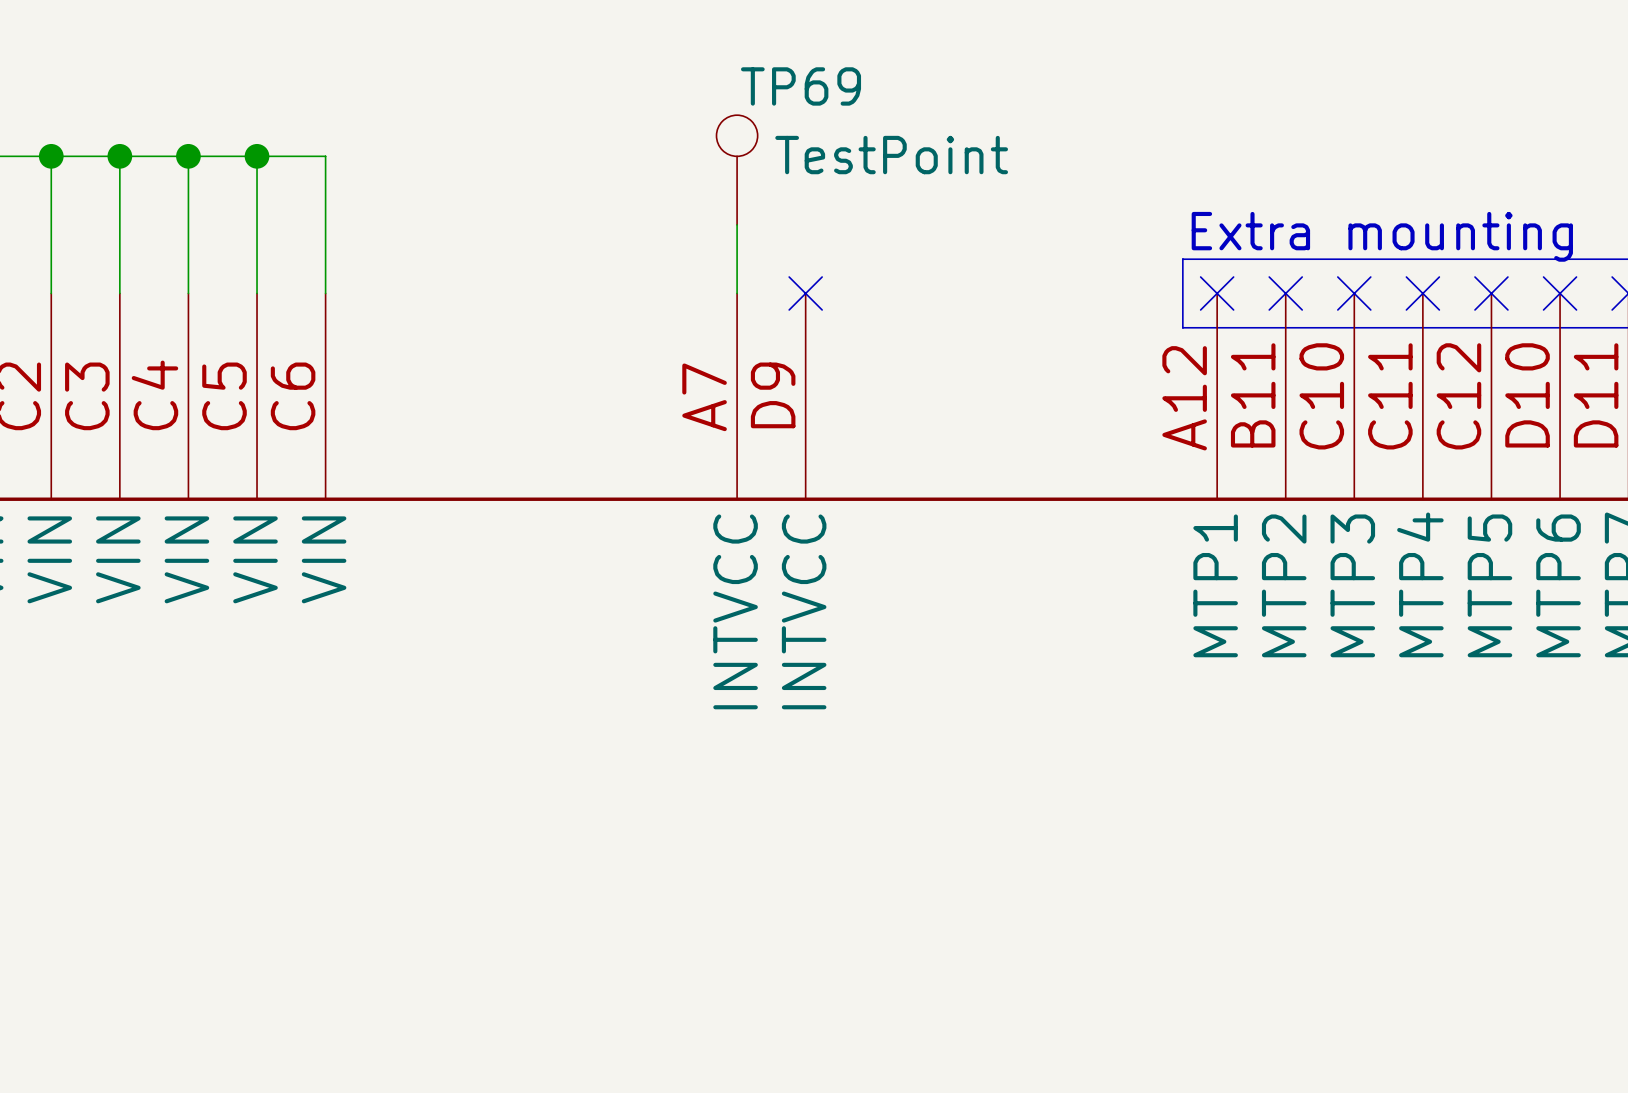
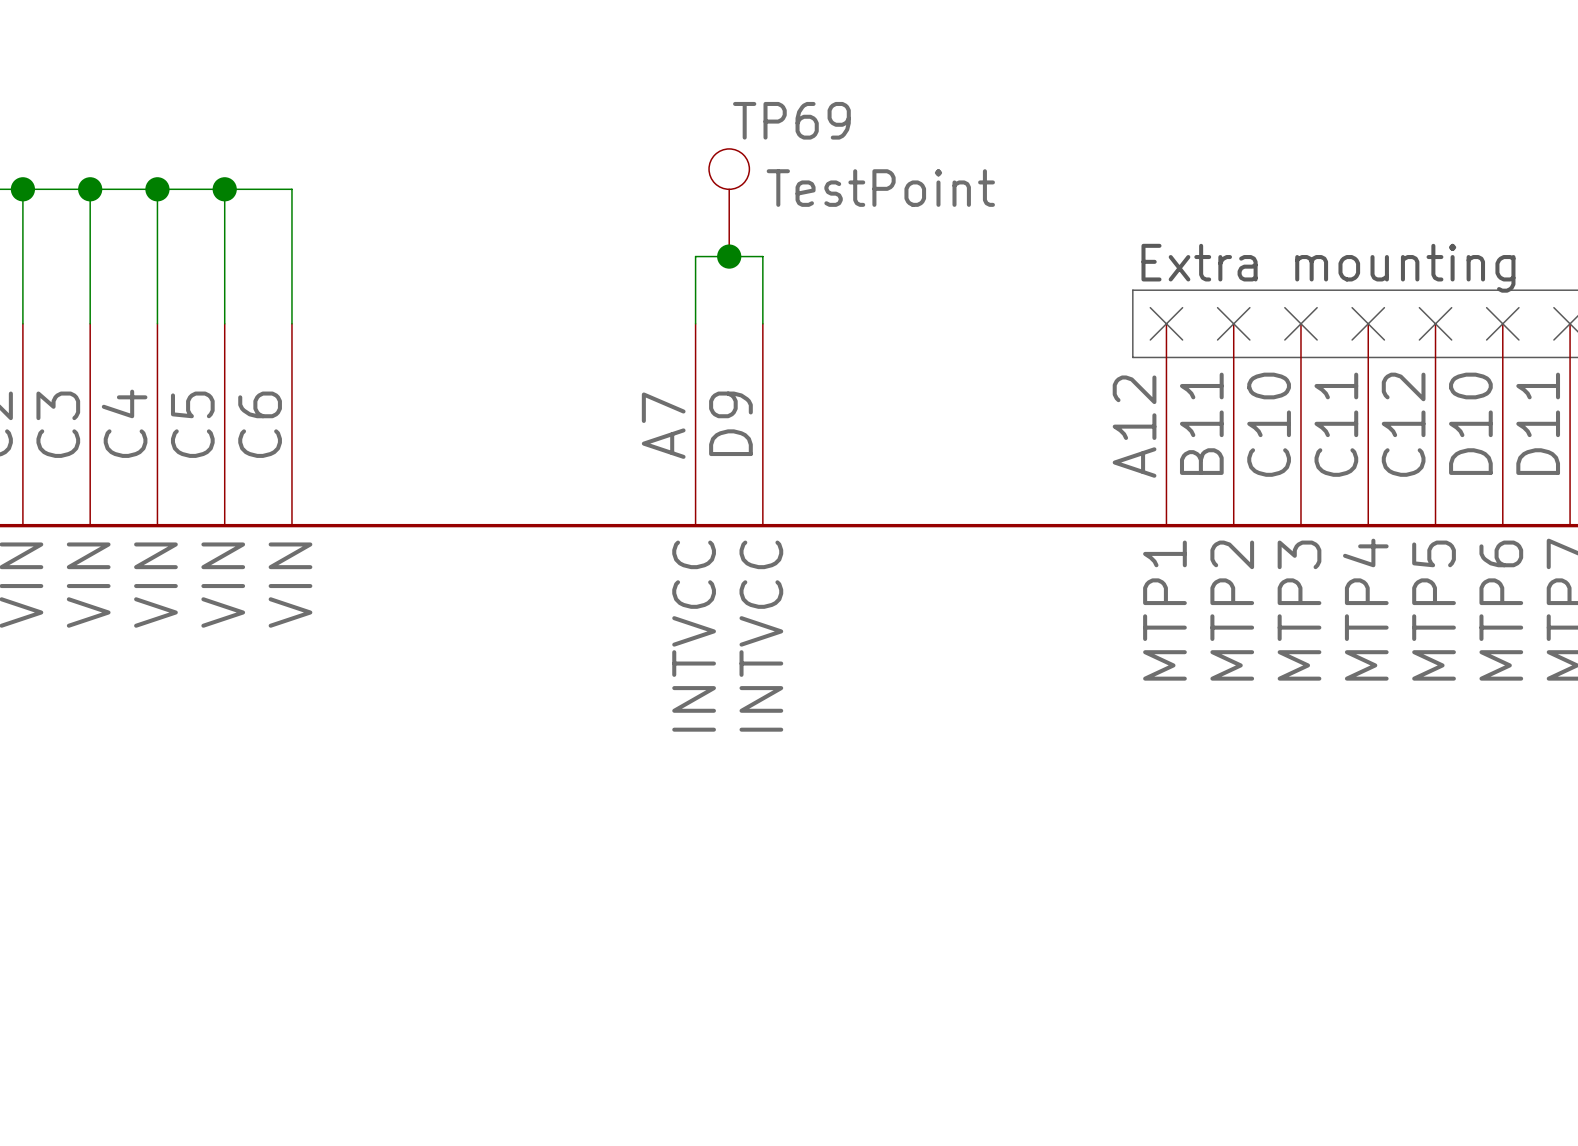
TP69 position: (737, 170) -> (729, 202)
wire: none -> (695, 256) (762, 256) (762, 323)
junction: none -> (729, 256)
no-connect mark: (805, 293) -> none

